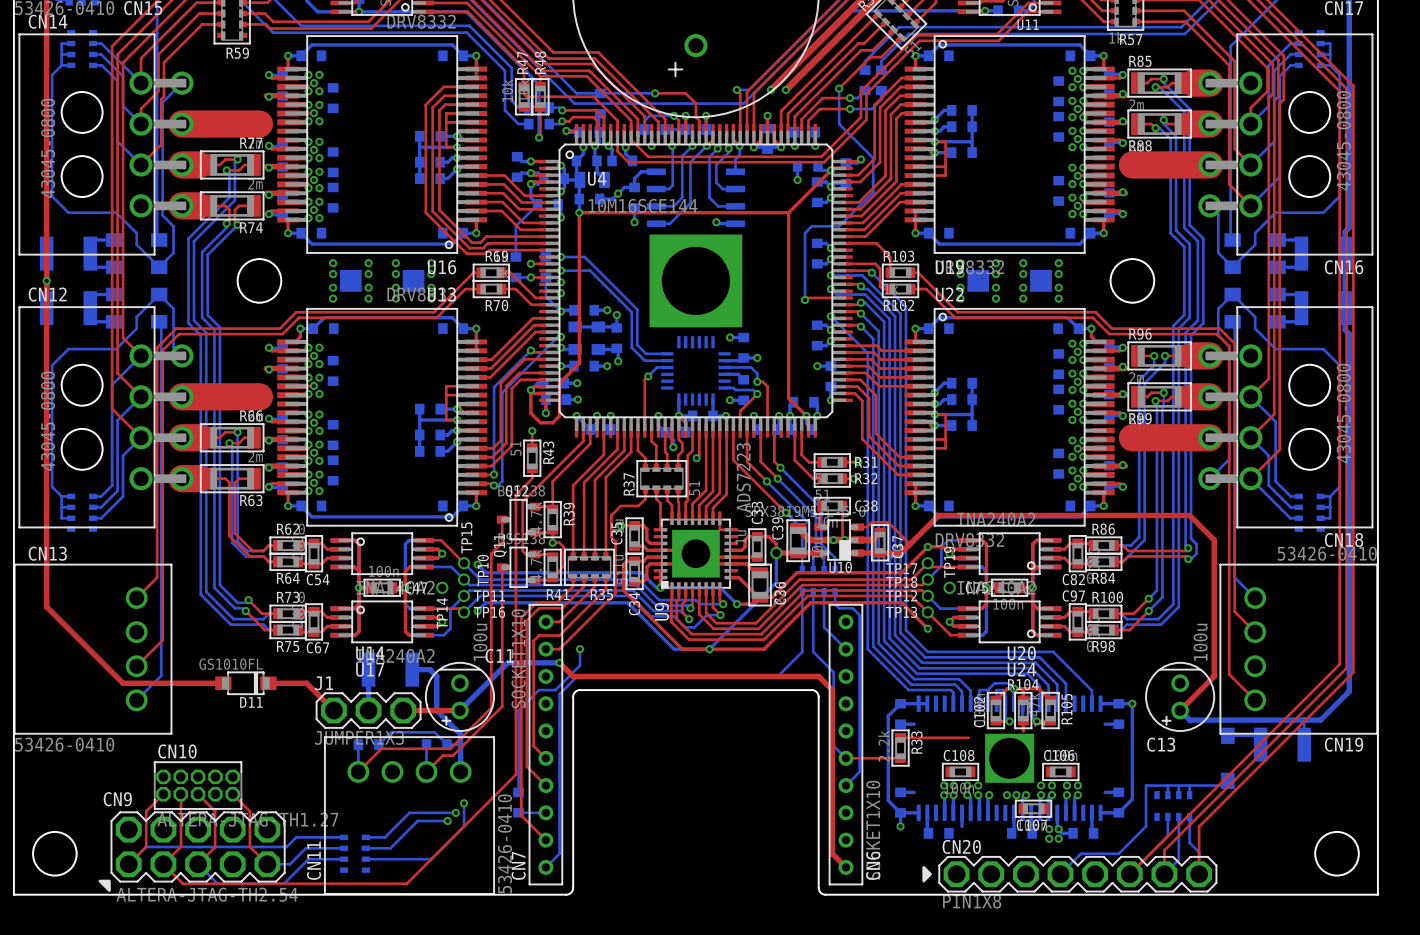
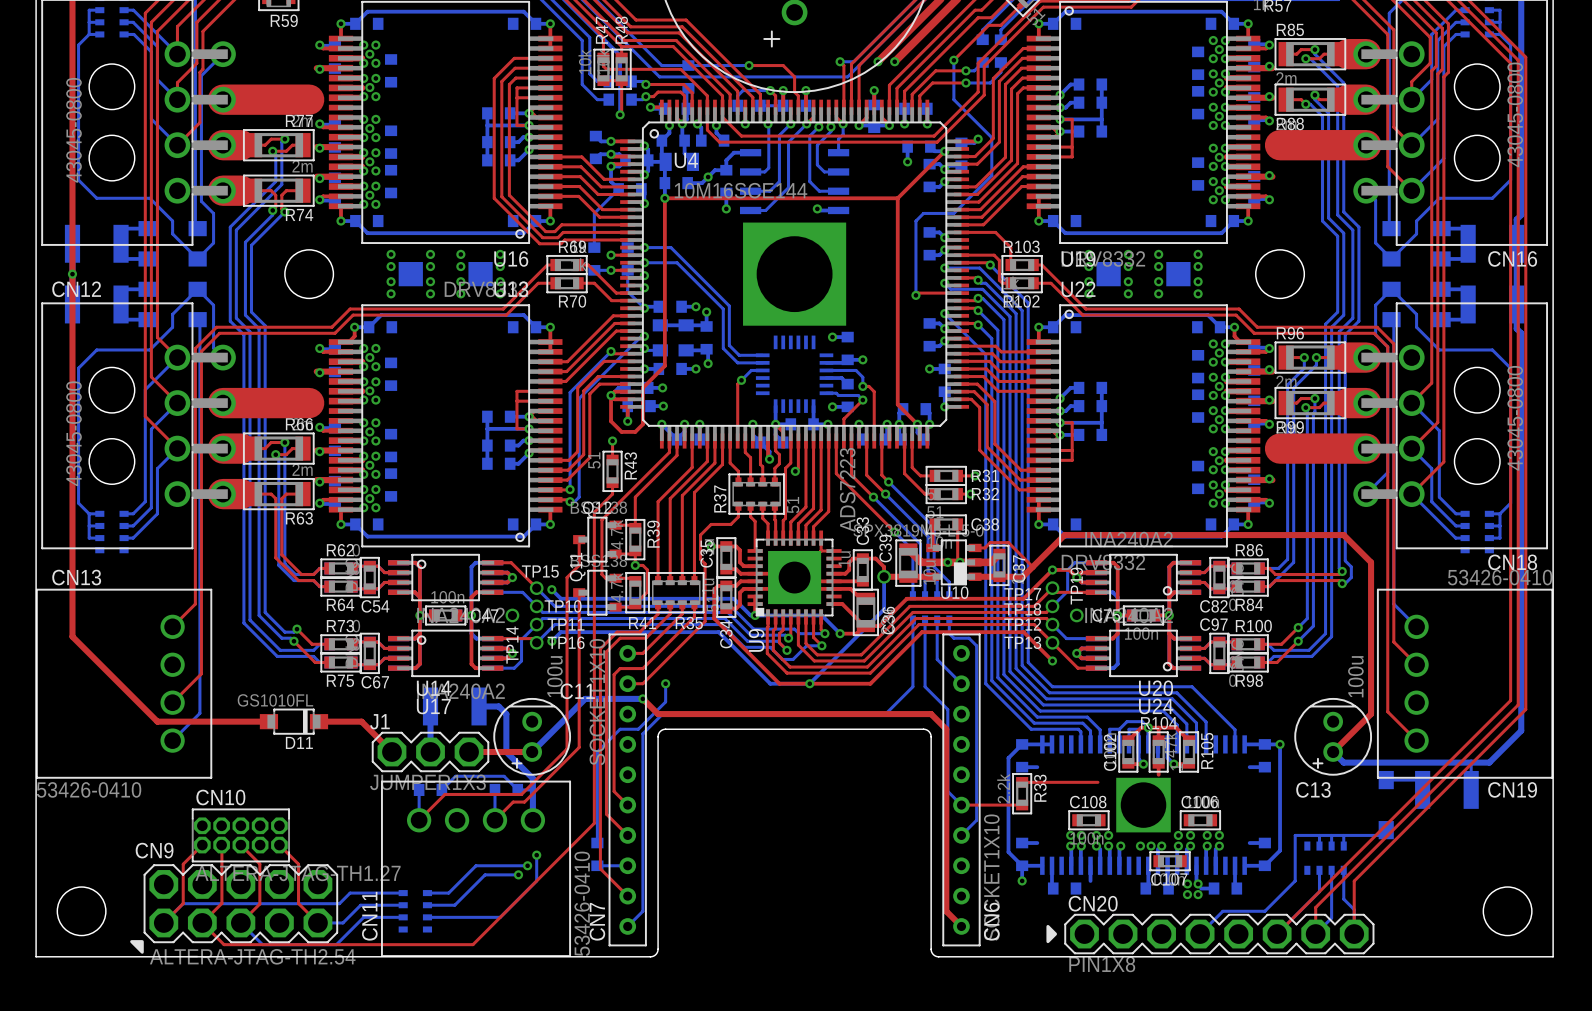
TP15 name rotation: 0° (466, 537) -> 90° clockwise (540, 571)
TP10 name rotation: 0° (483, 570) -> 90° clockwise (563, 606)
CN10 footprint: [153, 761, 243, 810] -> [191, 808, 291, 863]

